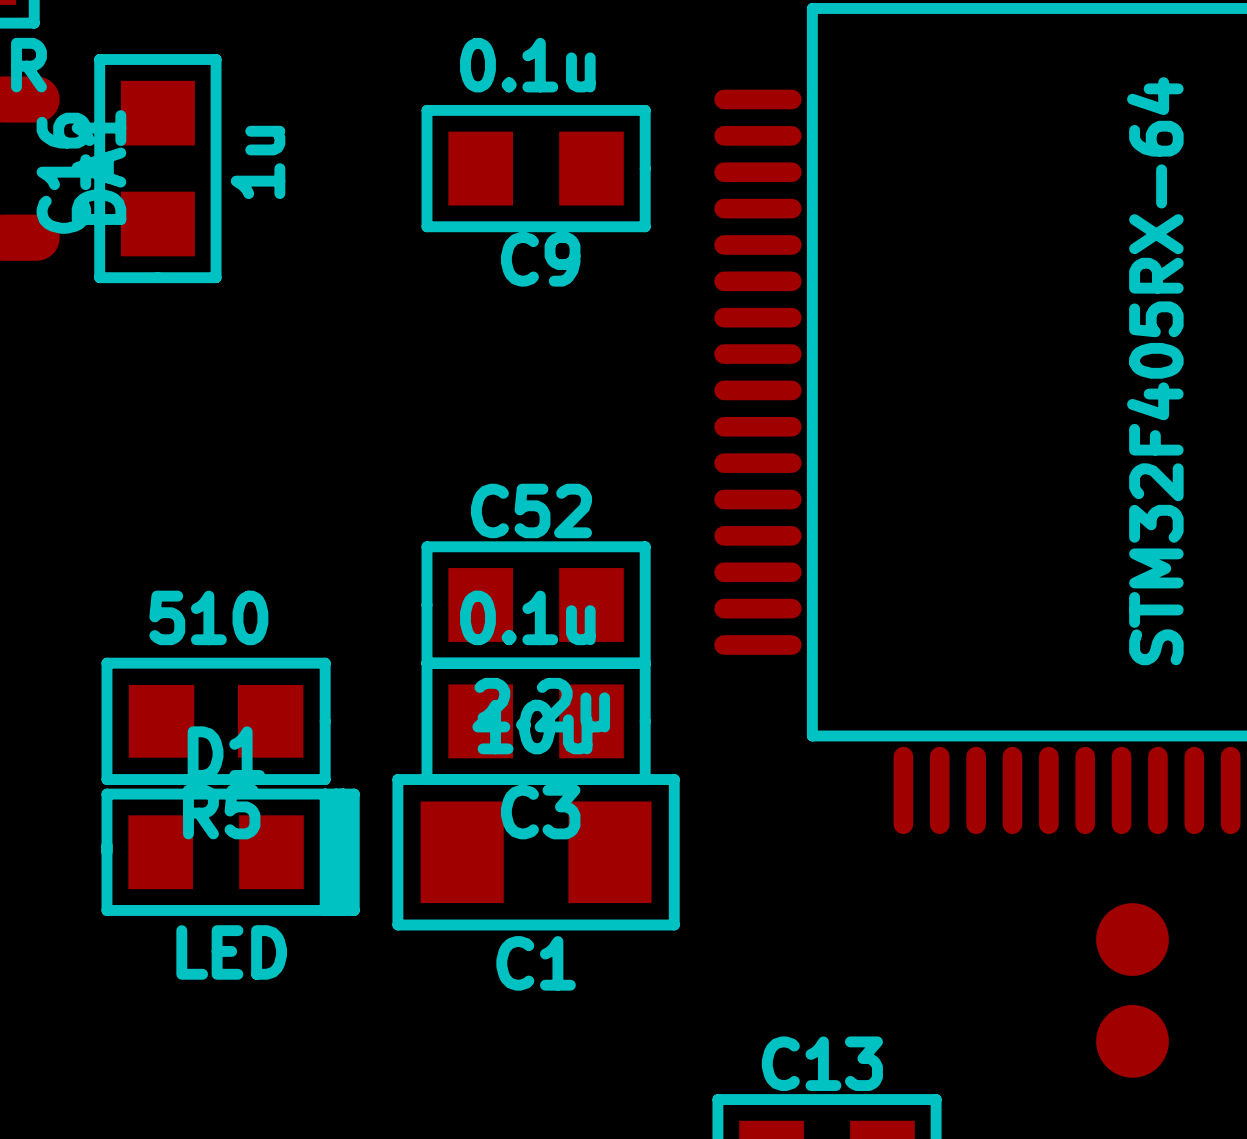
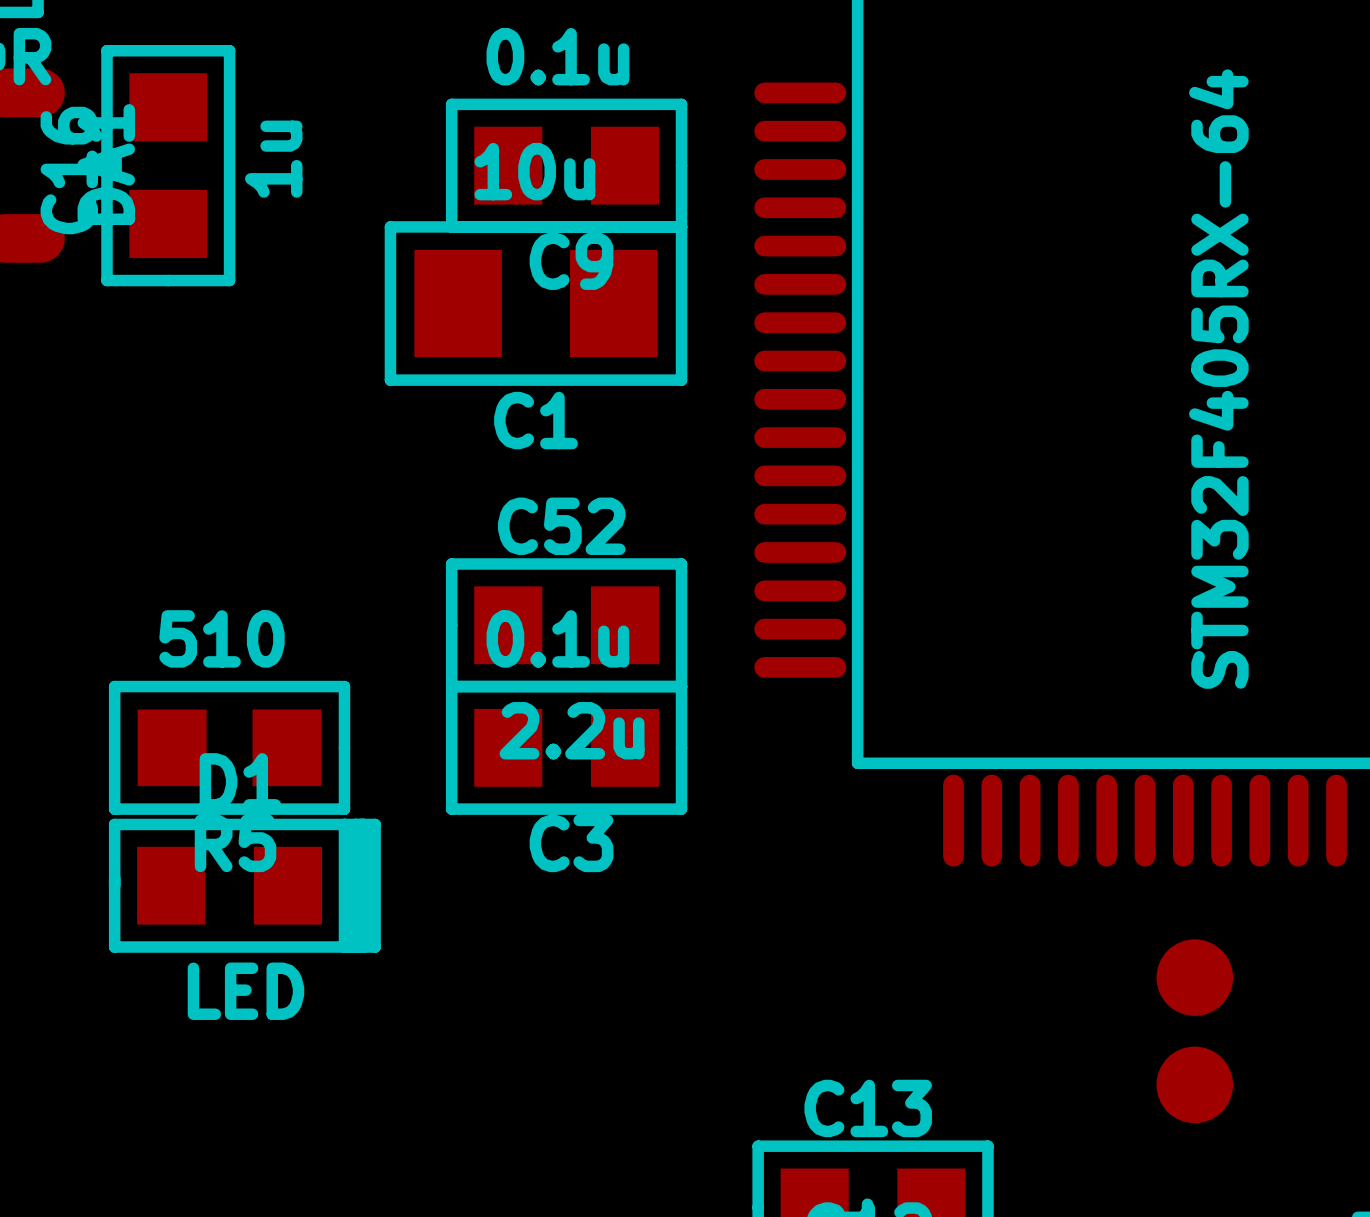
C1 position: (536, 852) -> (535, 303)

